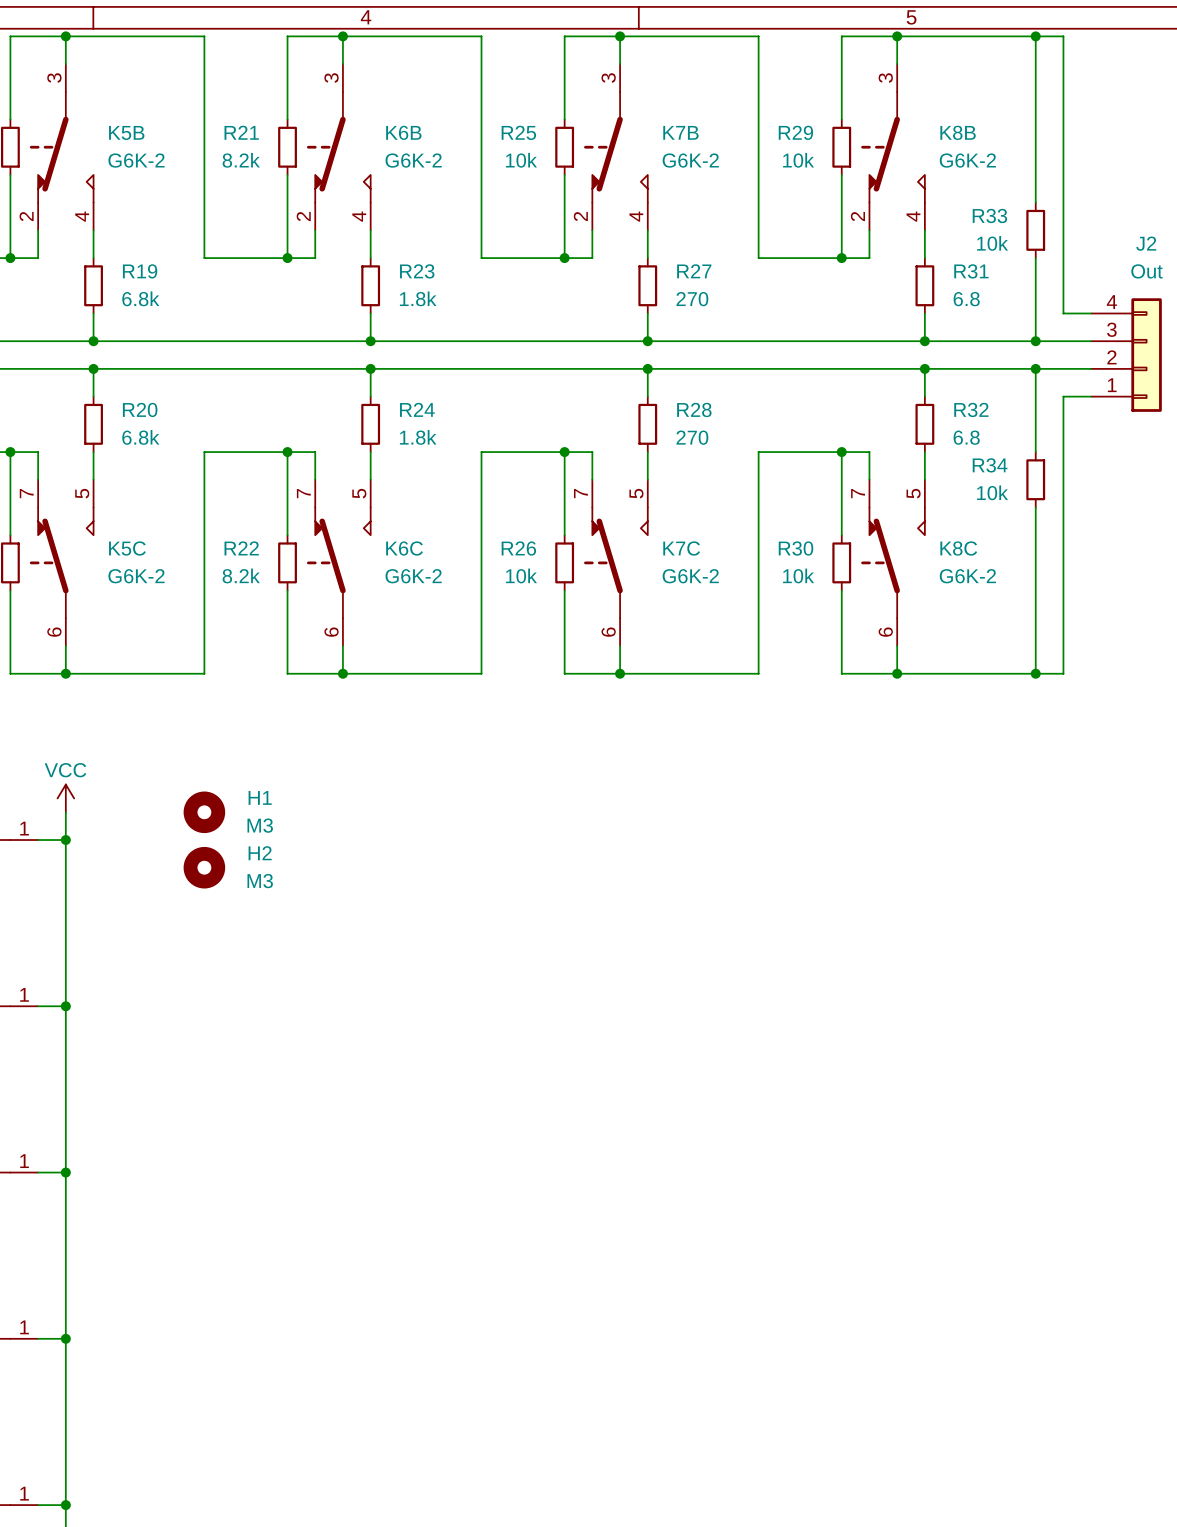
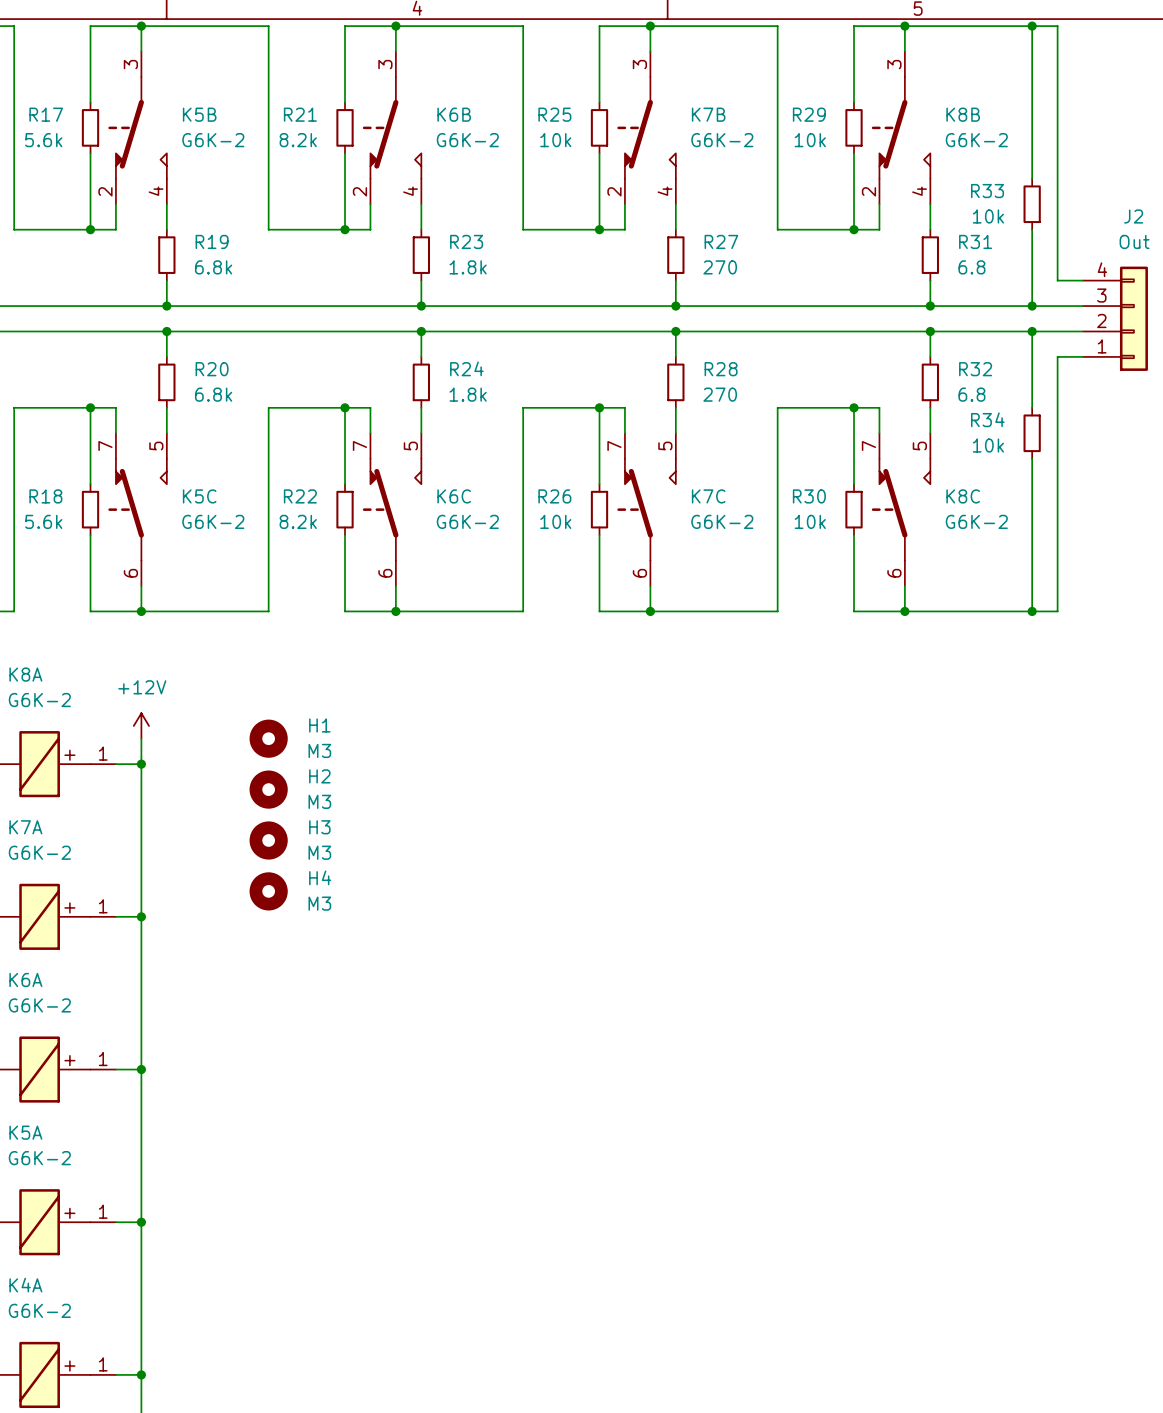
power symbol: VCC (65, 798) -> +12V (141, 725)
H3: none -> M3 (268, 840)
H4: none -> M3 (268, 891)

